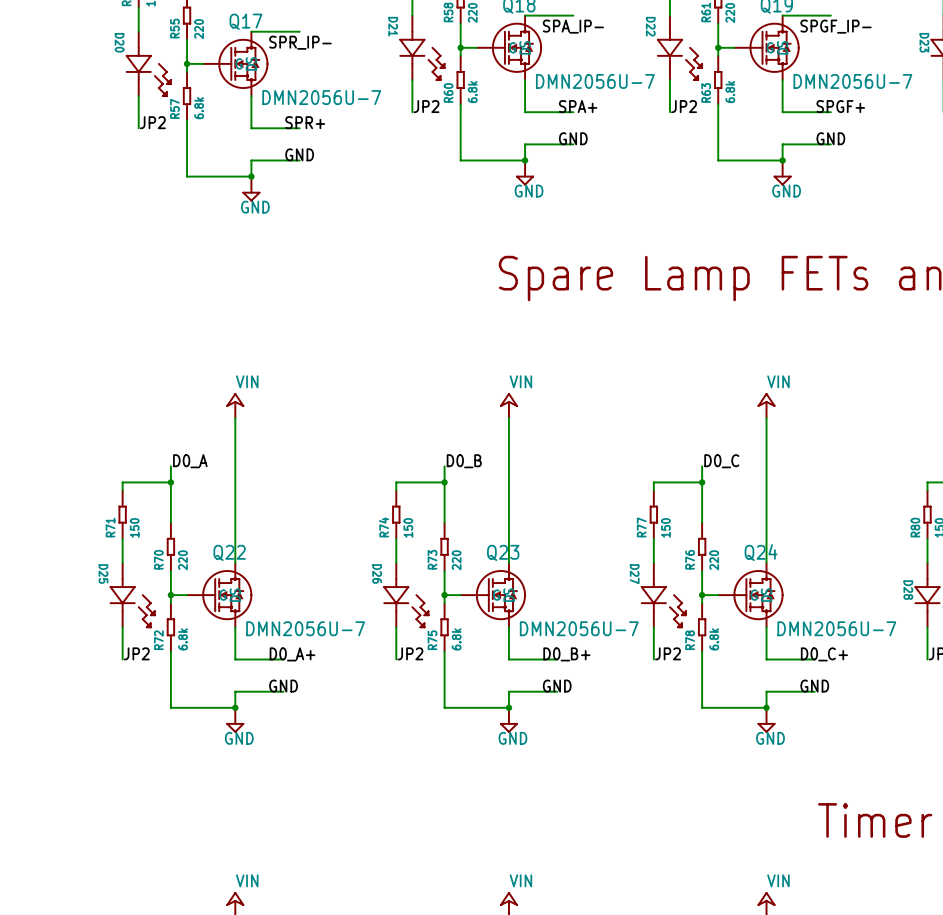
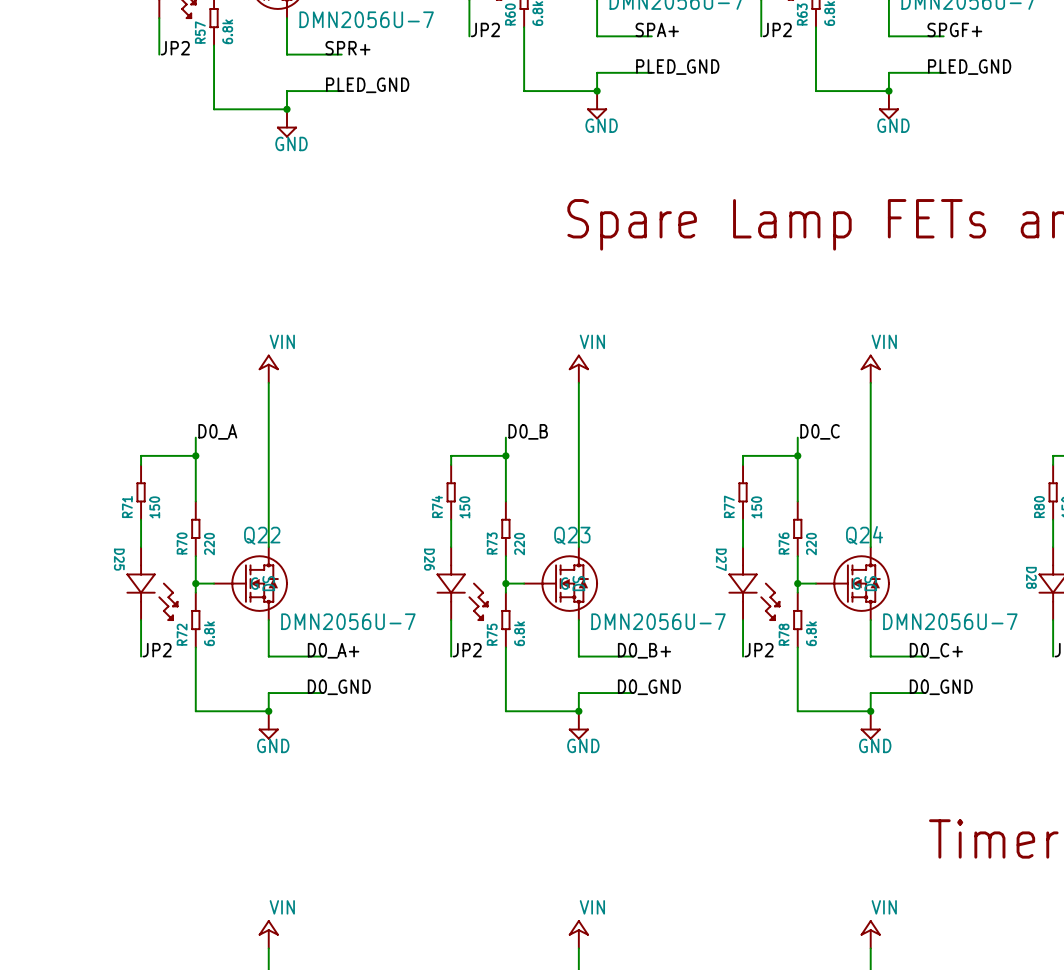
label: GND (573, 138) -> PLED_GND (677, 67)
label: GND (830, 138) -> PLED_GND (969, 67)
label: GND (299, 154) -> PLED_GND (367, 85)
label: GND (283, 686) -> D0_GND (339, 687)
label: GND (557, 686) -> D0_GND (649, 687)
label: GND (814, 686) -> D0_GND (941, 687)

